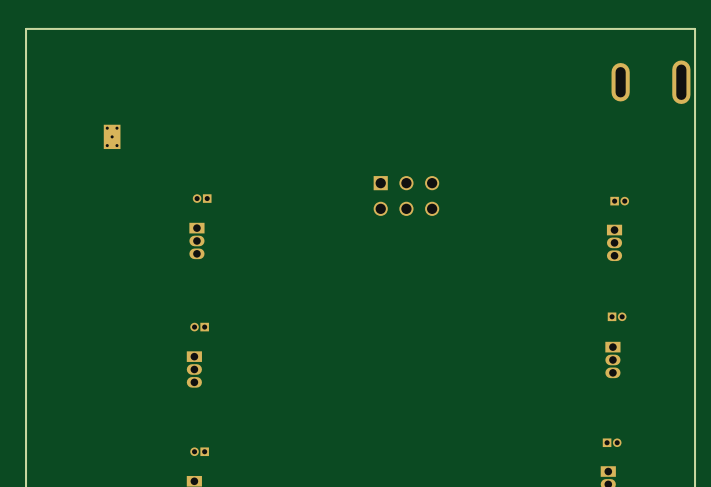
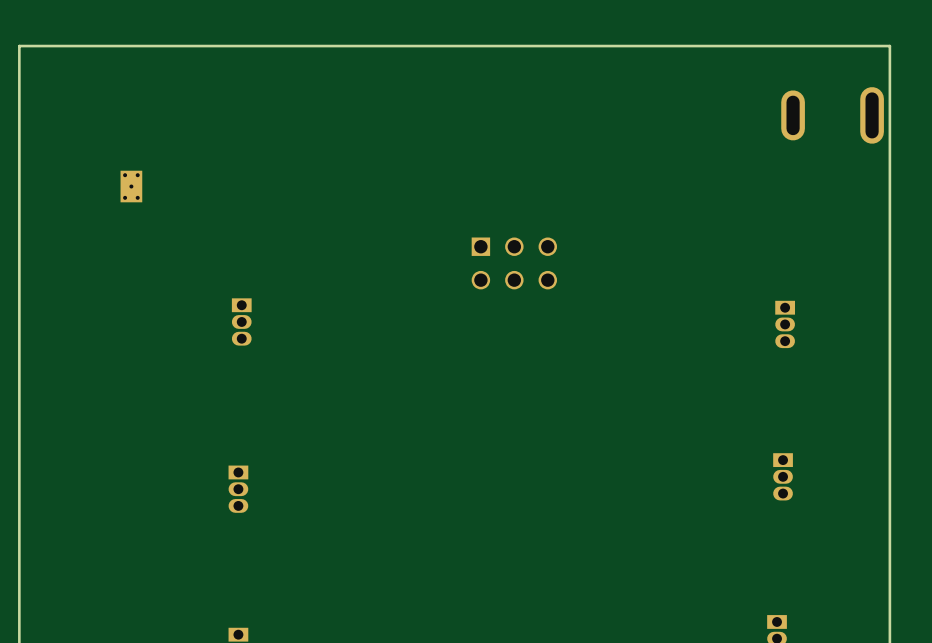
part: (202, 198) -> none
part: (619, 201) -> none
part: (617, 316) -> none
part: (199, 327) -> none
part: (612, 442) -> none
part: (199, 451) -> none

